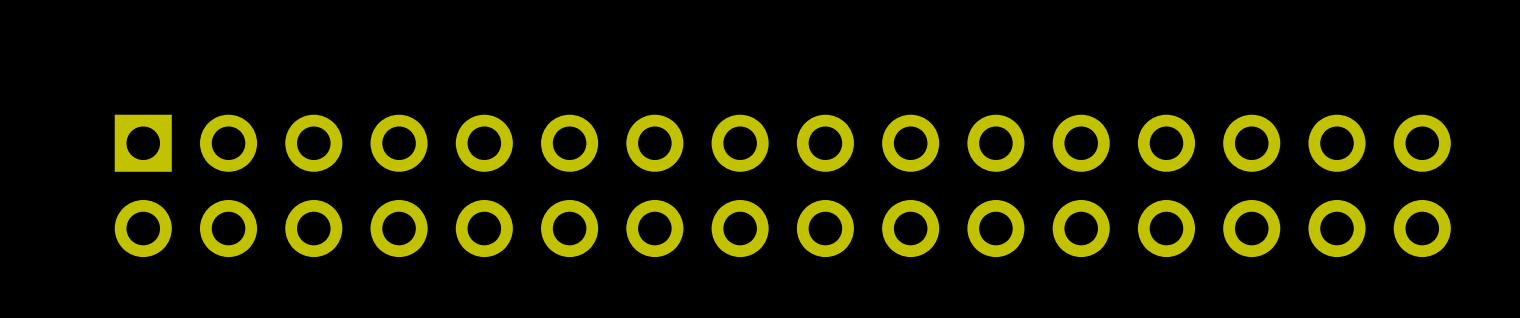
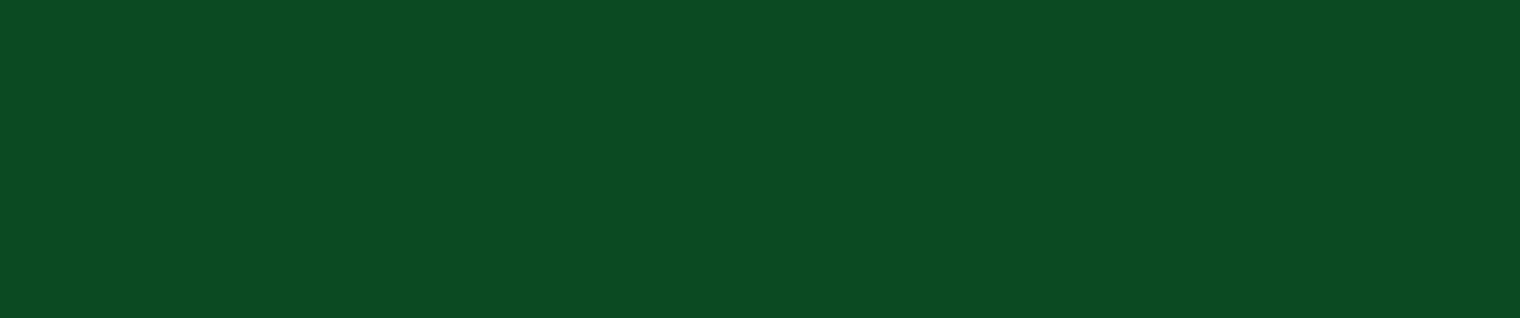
part: (782, 185) -> none

